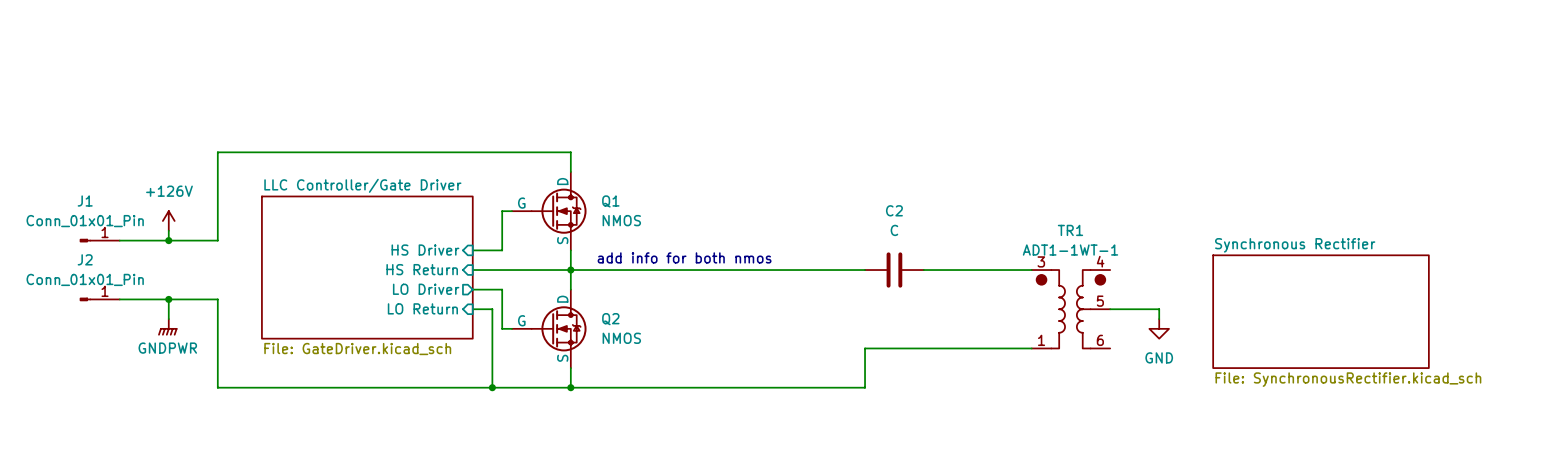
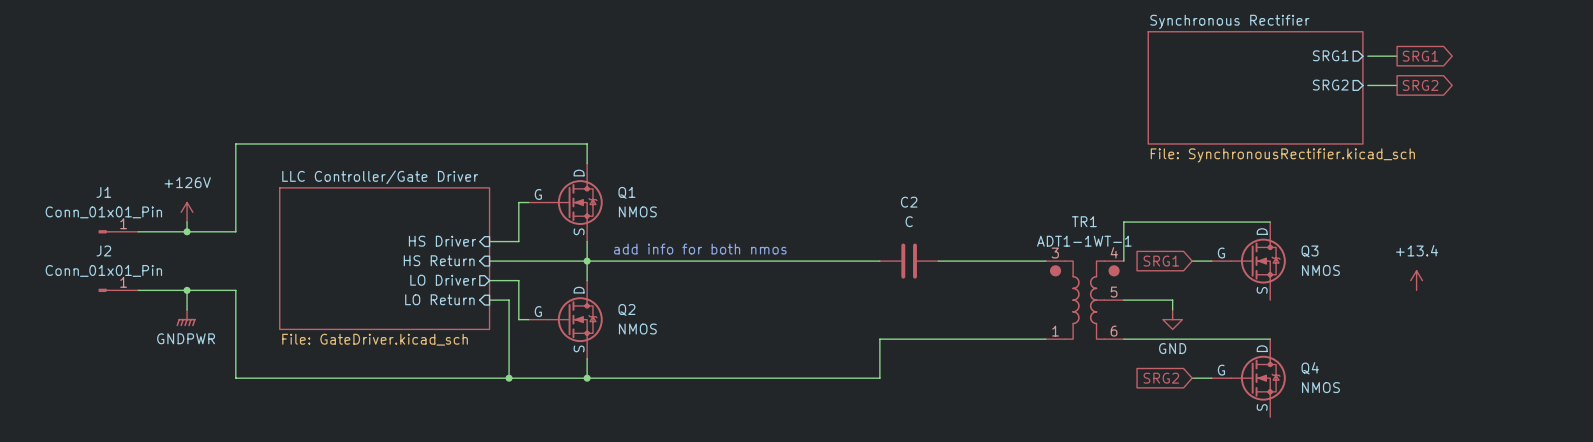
sheet pin: none -> SRG1 (1330, 55)
wire: none -> (1367, 56) (1397, 56)
global label: none -> SRG1 (1420, 56)
sheet pin: none -> SRG2 (1330, 85)
wire: none -> (1367, 85) (1397, 85)
global label: none -> SRG2 (1420, 85)
sheet Synchronous Rectifier: none -> File: SynchronousRectifier.kicad_sch (1255, 87)
wire: none -> (1270, 222) (1123, 222) (1123, 261)
global label: none -> SRG1 (1161, 261)
wire: none -> (1192, 261) (1211, 261)
Q3: none -> NMOS (1248, 261)
power symbol: none -> +13.4 (1416, 280)
sheet Synchronous Rectifier: File: SynchronousRectifier.kicad_sch (1321, 311) -> none
wire: none -> (1123, 339) (1270, 339)
global label: none -> SRG2 (1161, 378)
wire: none -> (1192, 378) (1211, 378)
Q4: none -> NMOS (1248, 378)

